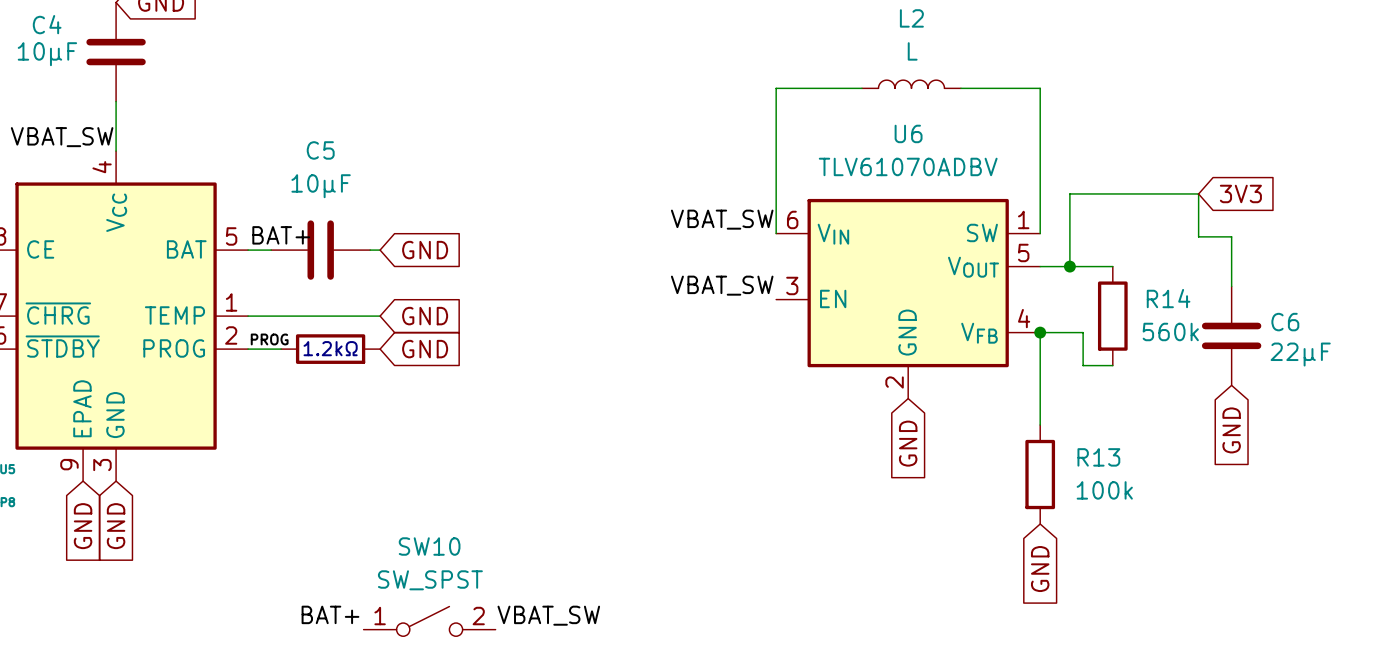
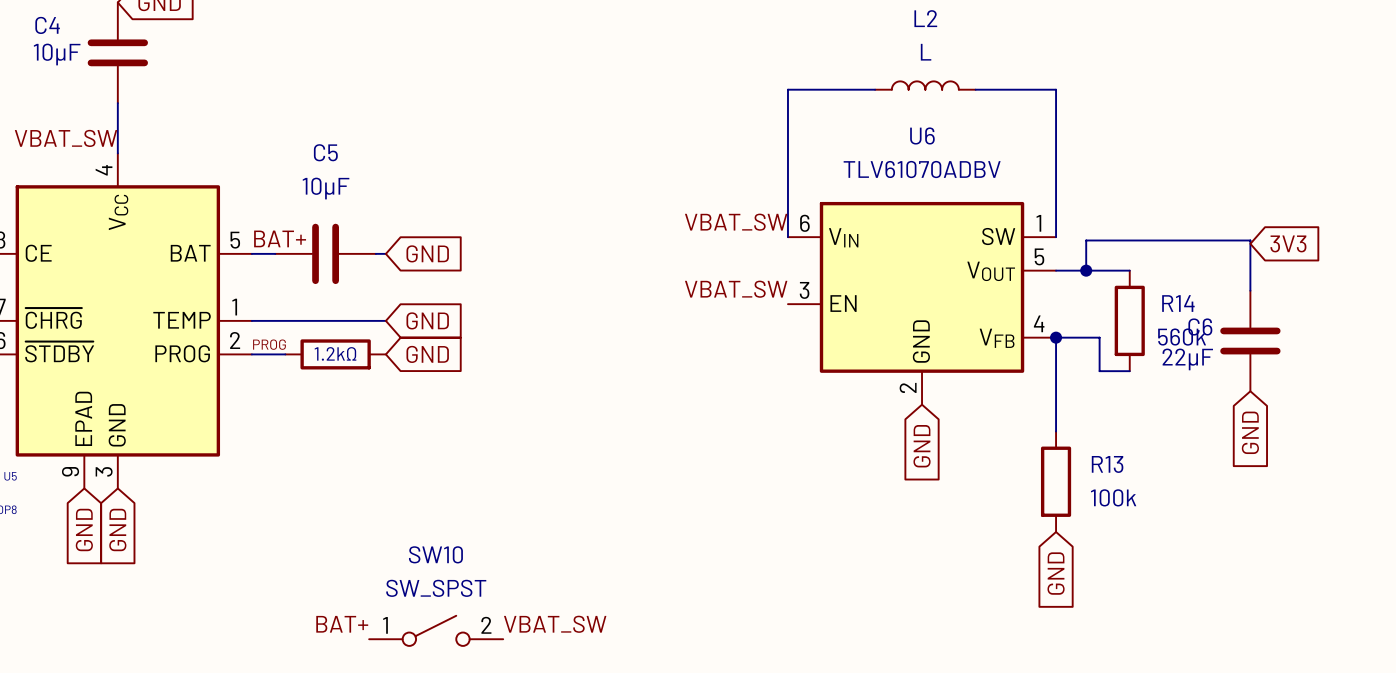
global label position: 3V3 (1240, 193) -> 3V3 (1288, 243)
wire: (1069, 236) (1069, 193) (1198, 193) (1198, 236) -> (1086, 240) (1216, 240)
C6 name position: C6 (1285, 322) -> C6 (1200, 326)
C6 value position: 22µF (1300, 354) -> 22µF (1187, 359)

